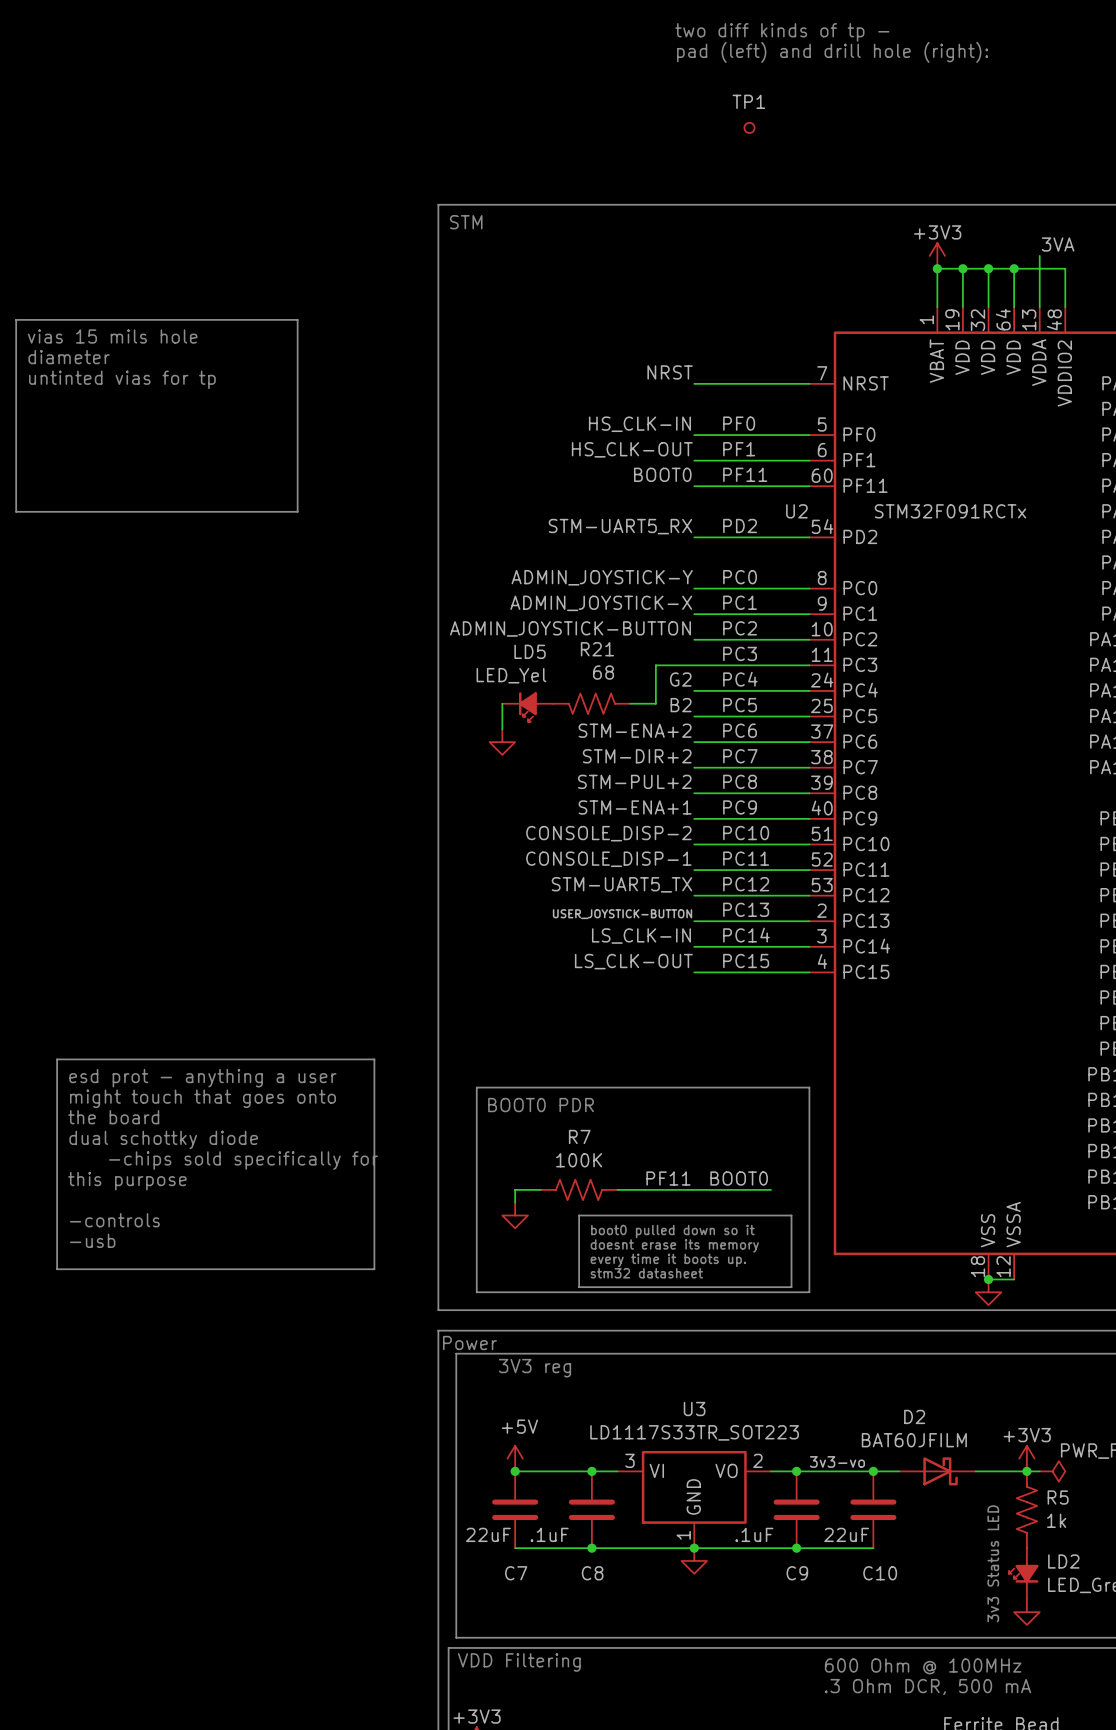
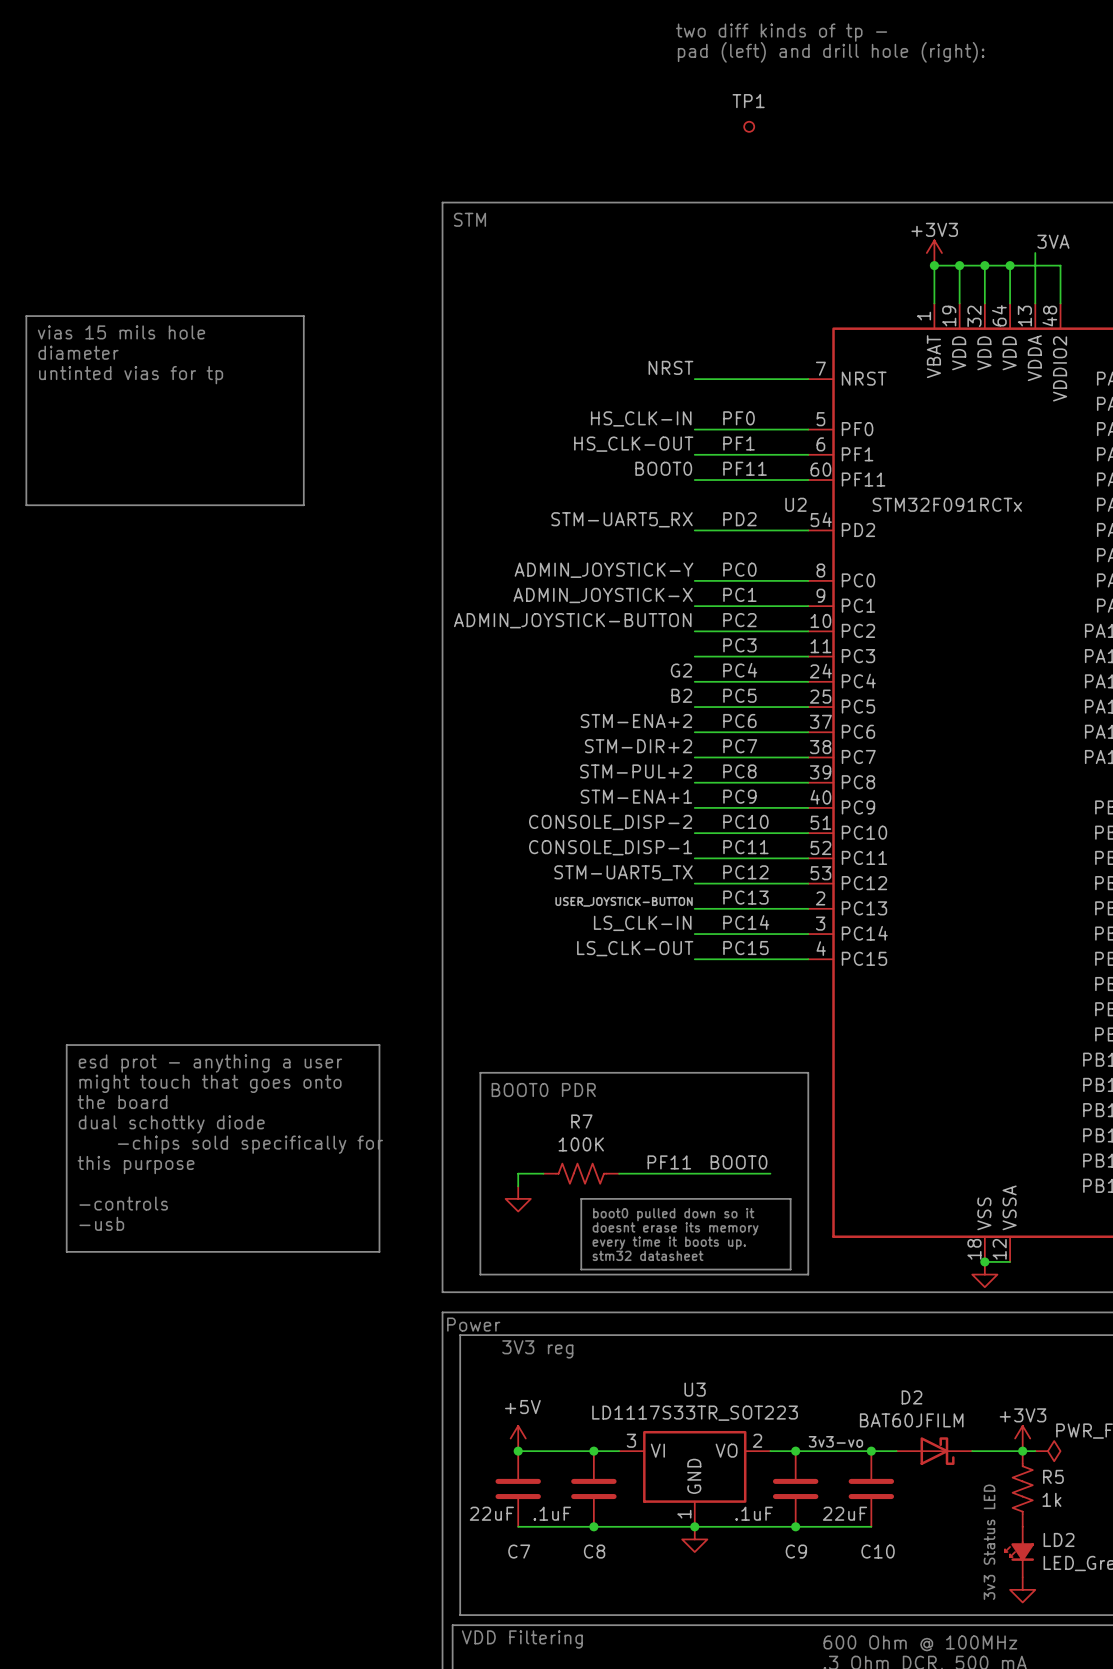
wire: (694, 665) (655, 665) (655, 703) (630, 703) -> none
wire: (502, 703) (502, 729) -> none
R21: 68 (591, 703) -> none
LD5: LED_Yel (527, 706) -> none
power symbol: (502, 742) -> none

